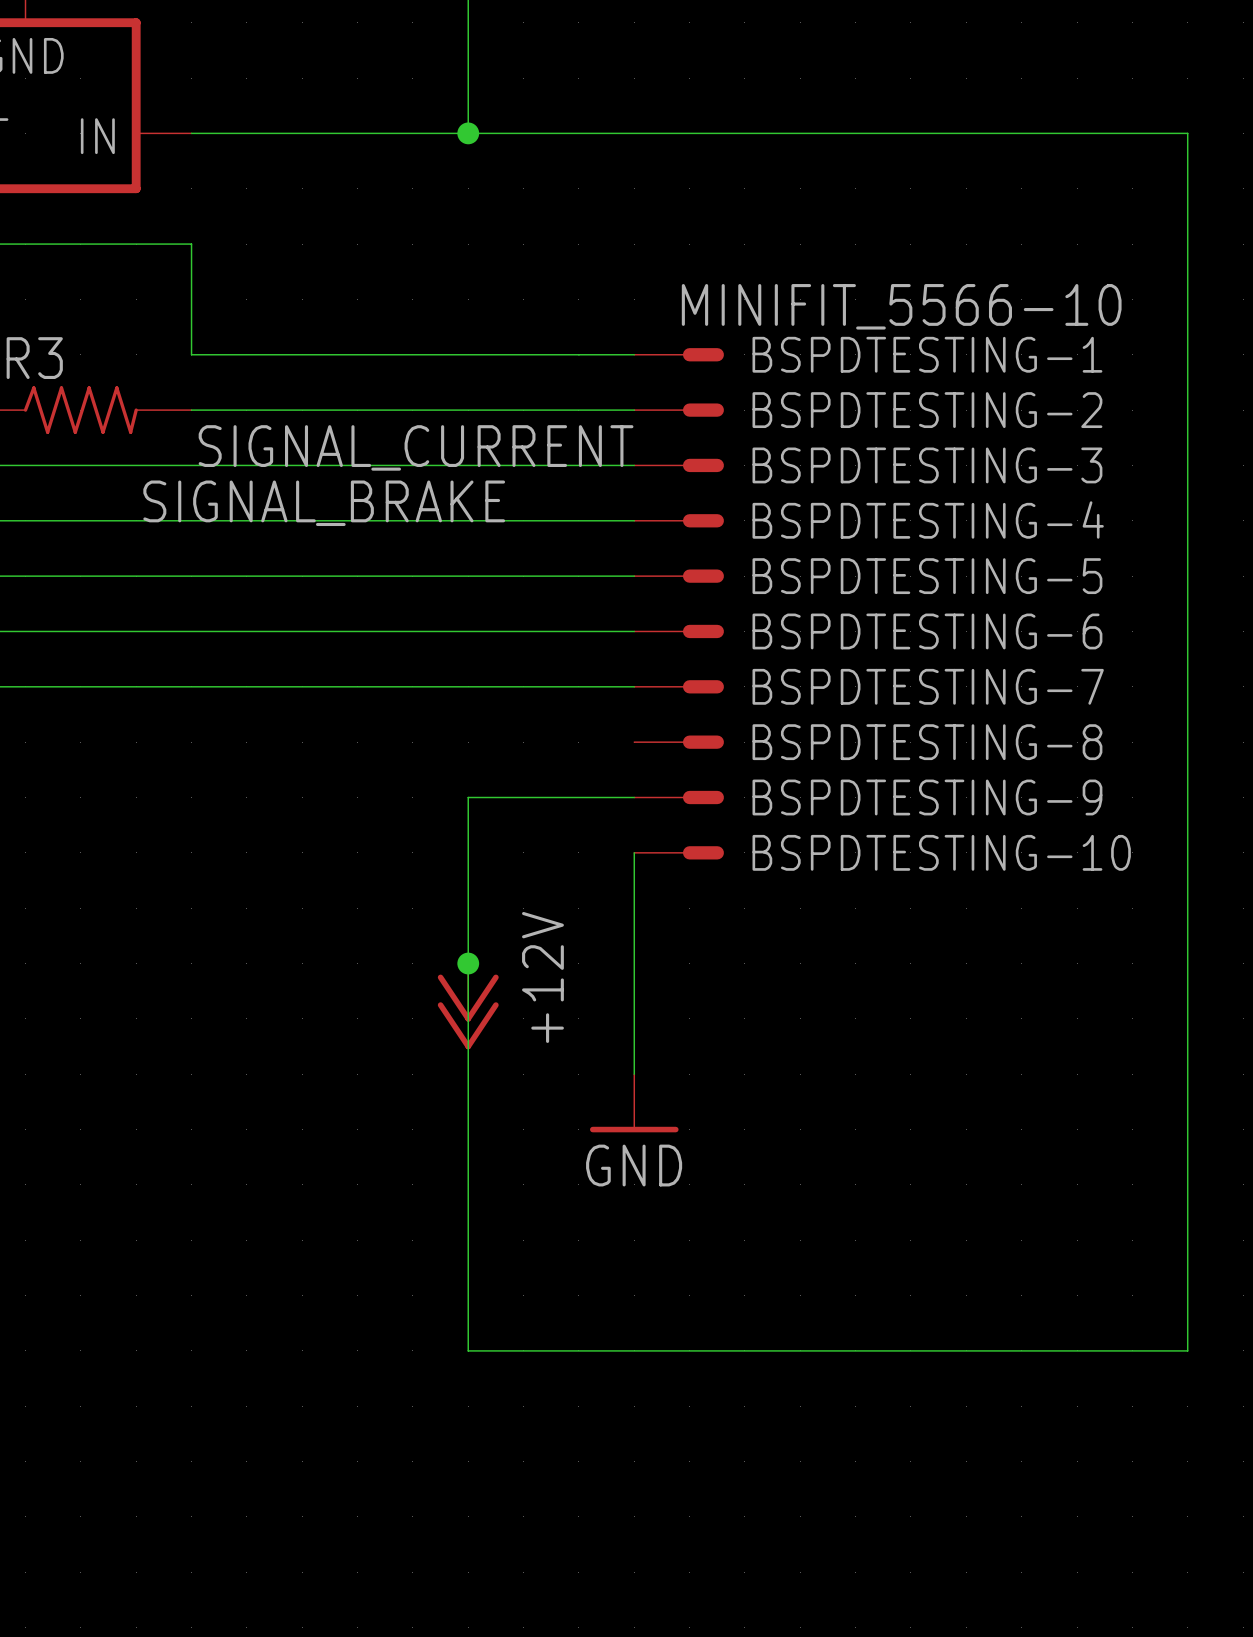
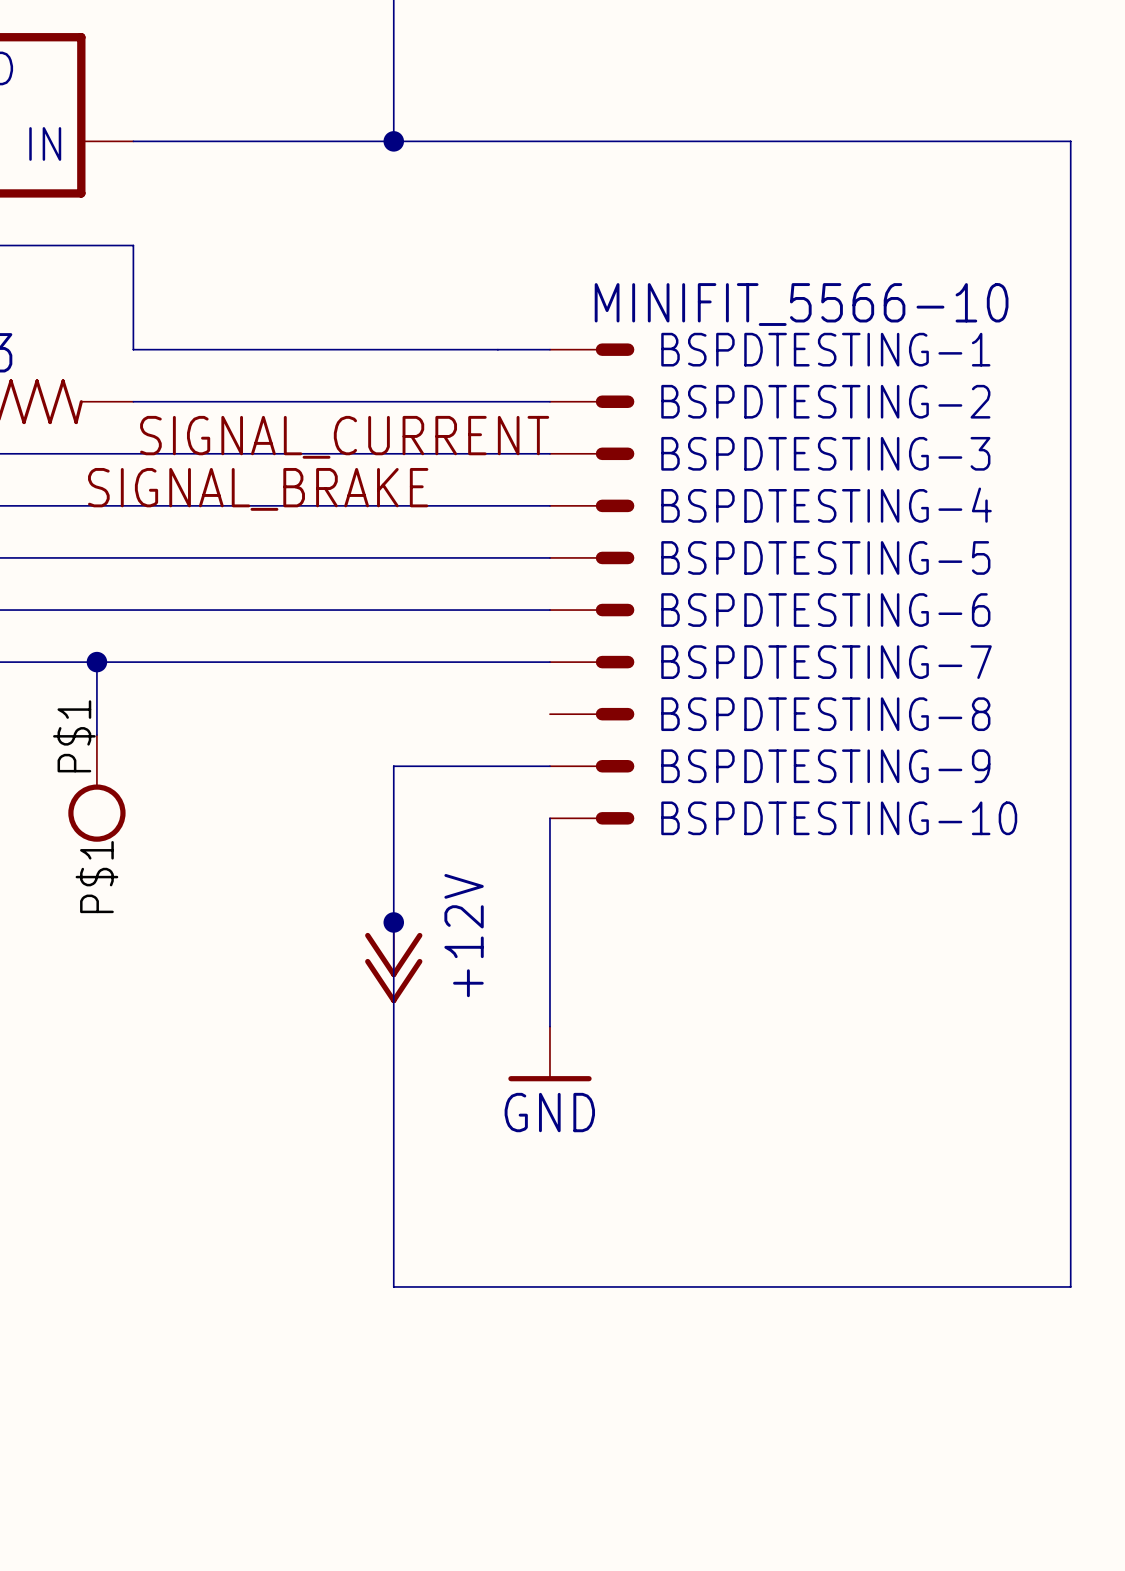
wire: none -> (96, 662) (96, 735)
junction: none -> (96, 662)
part: none -> (96, 788)

